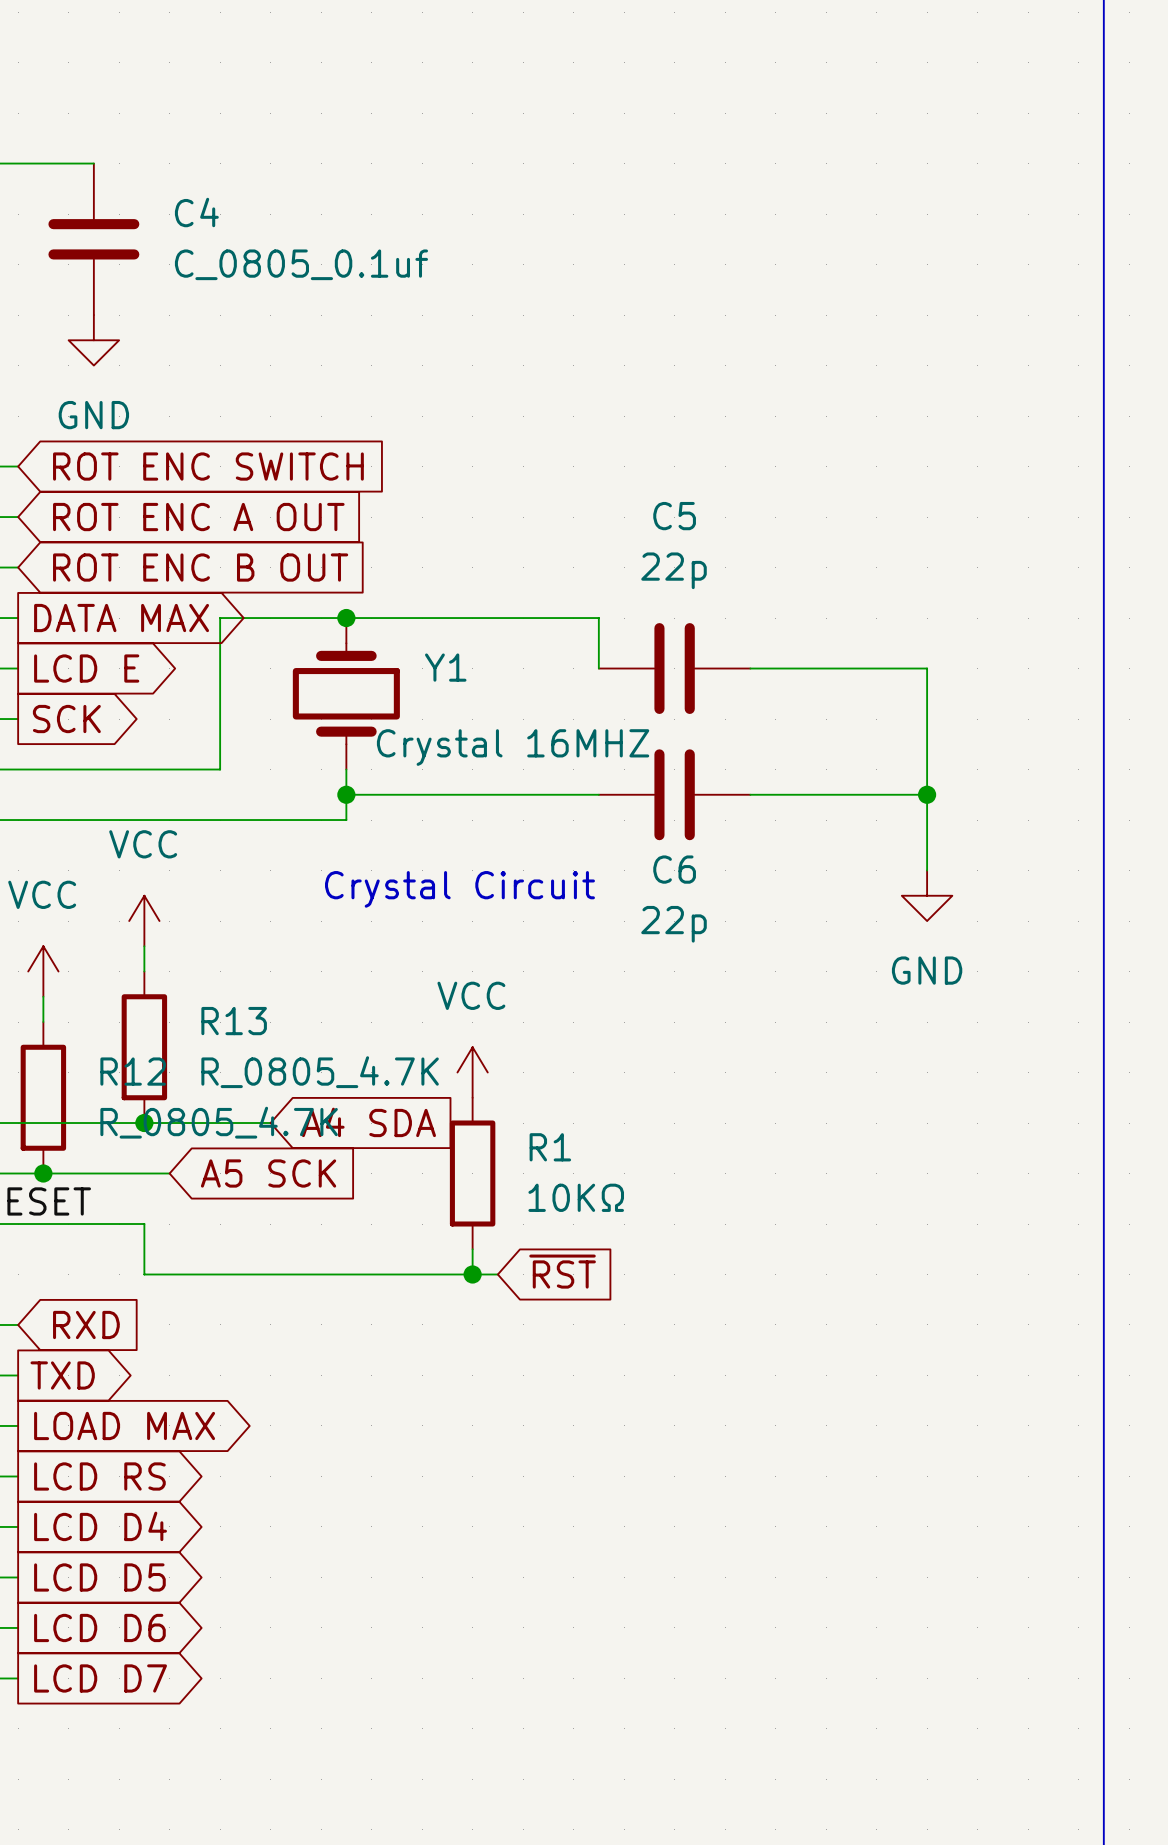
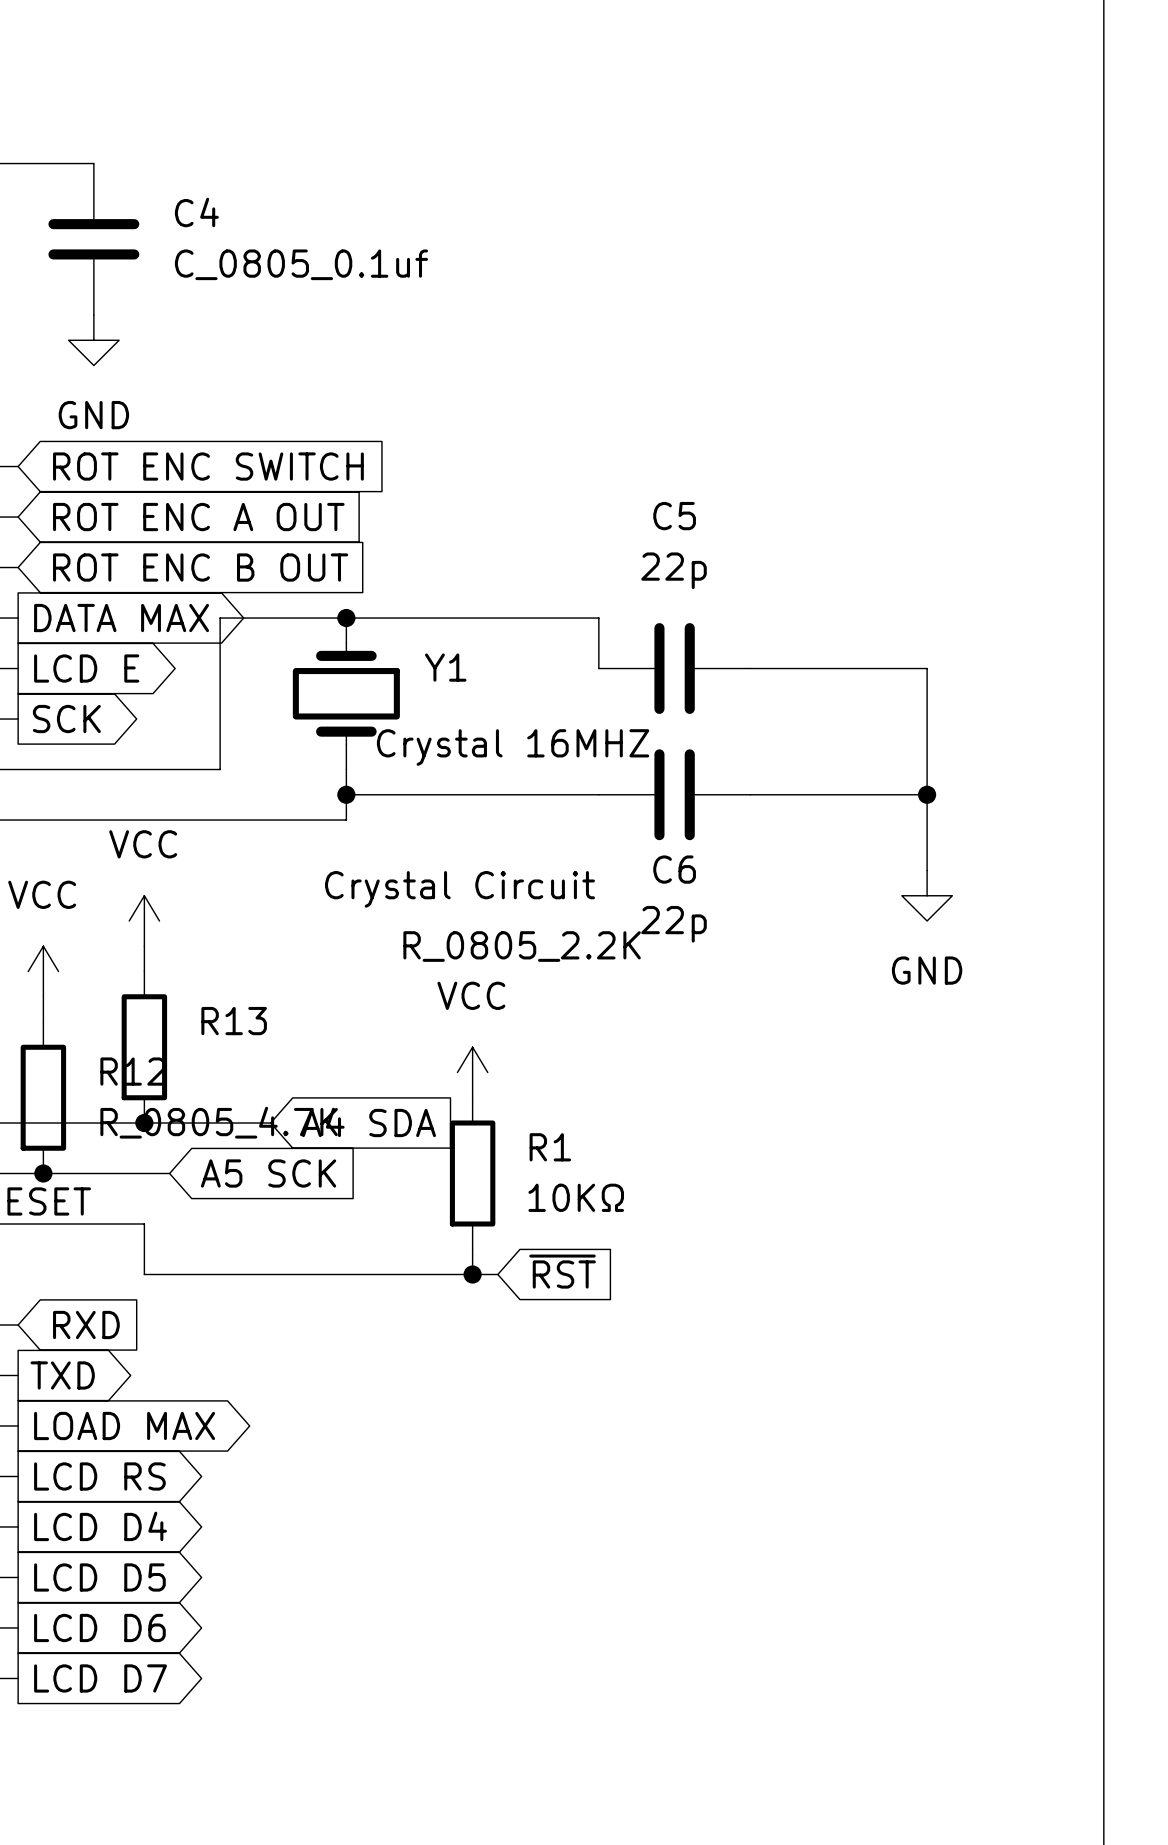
R13 value: R_0805_4.7K (320, 1072) -> R_0805_2.2K (522, 946)

